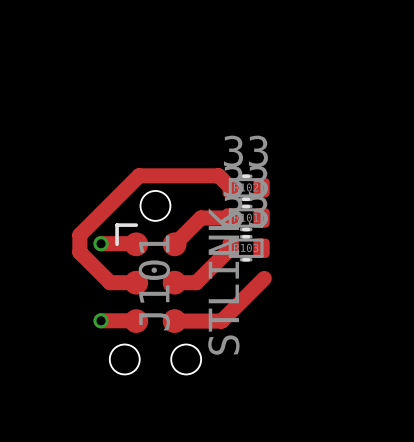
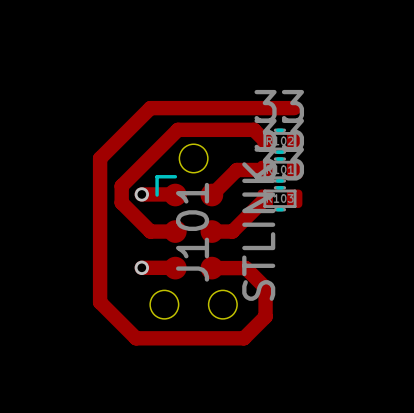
track: (264, 278) (221, 321) (210, 321) -> (294, 108) (150, 108) (100, 158) (100, 302) (136, 338) (243, 338) (265, 316) (265, 287) (245, 268)

